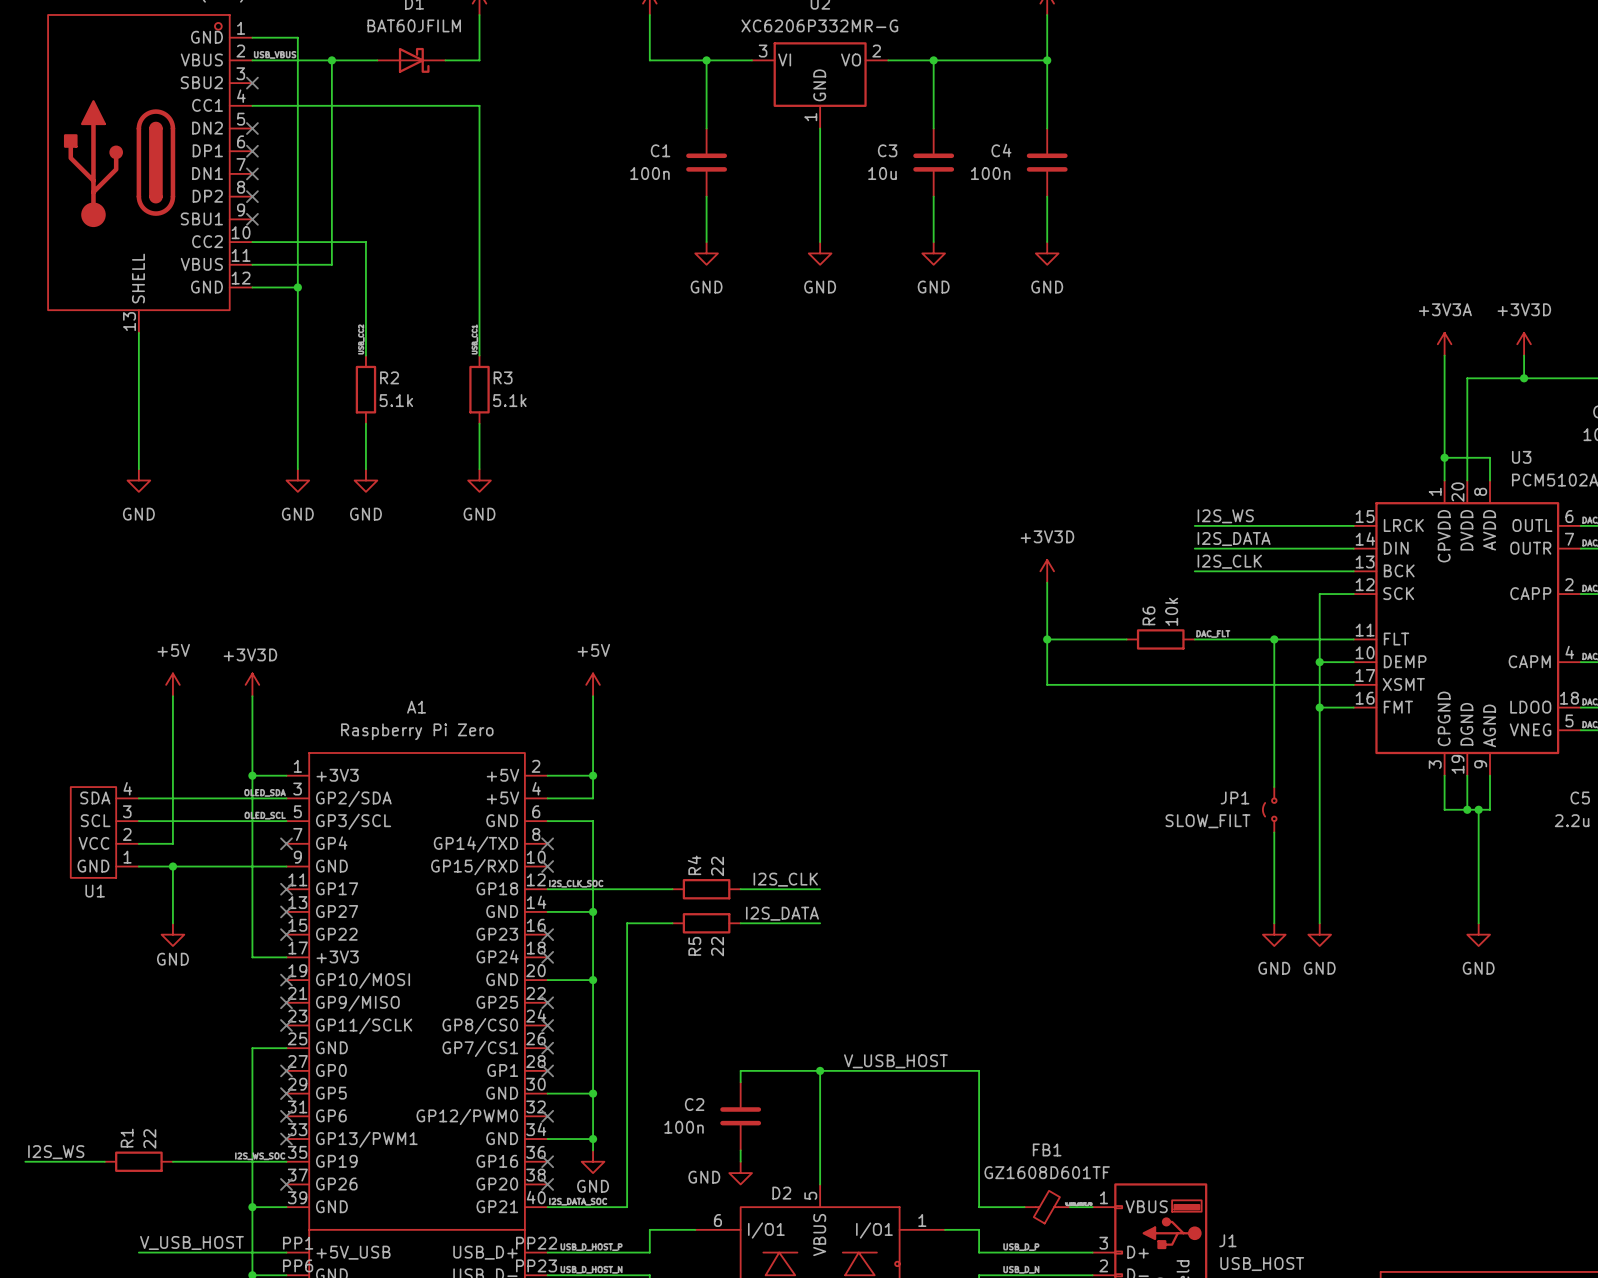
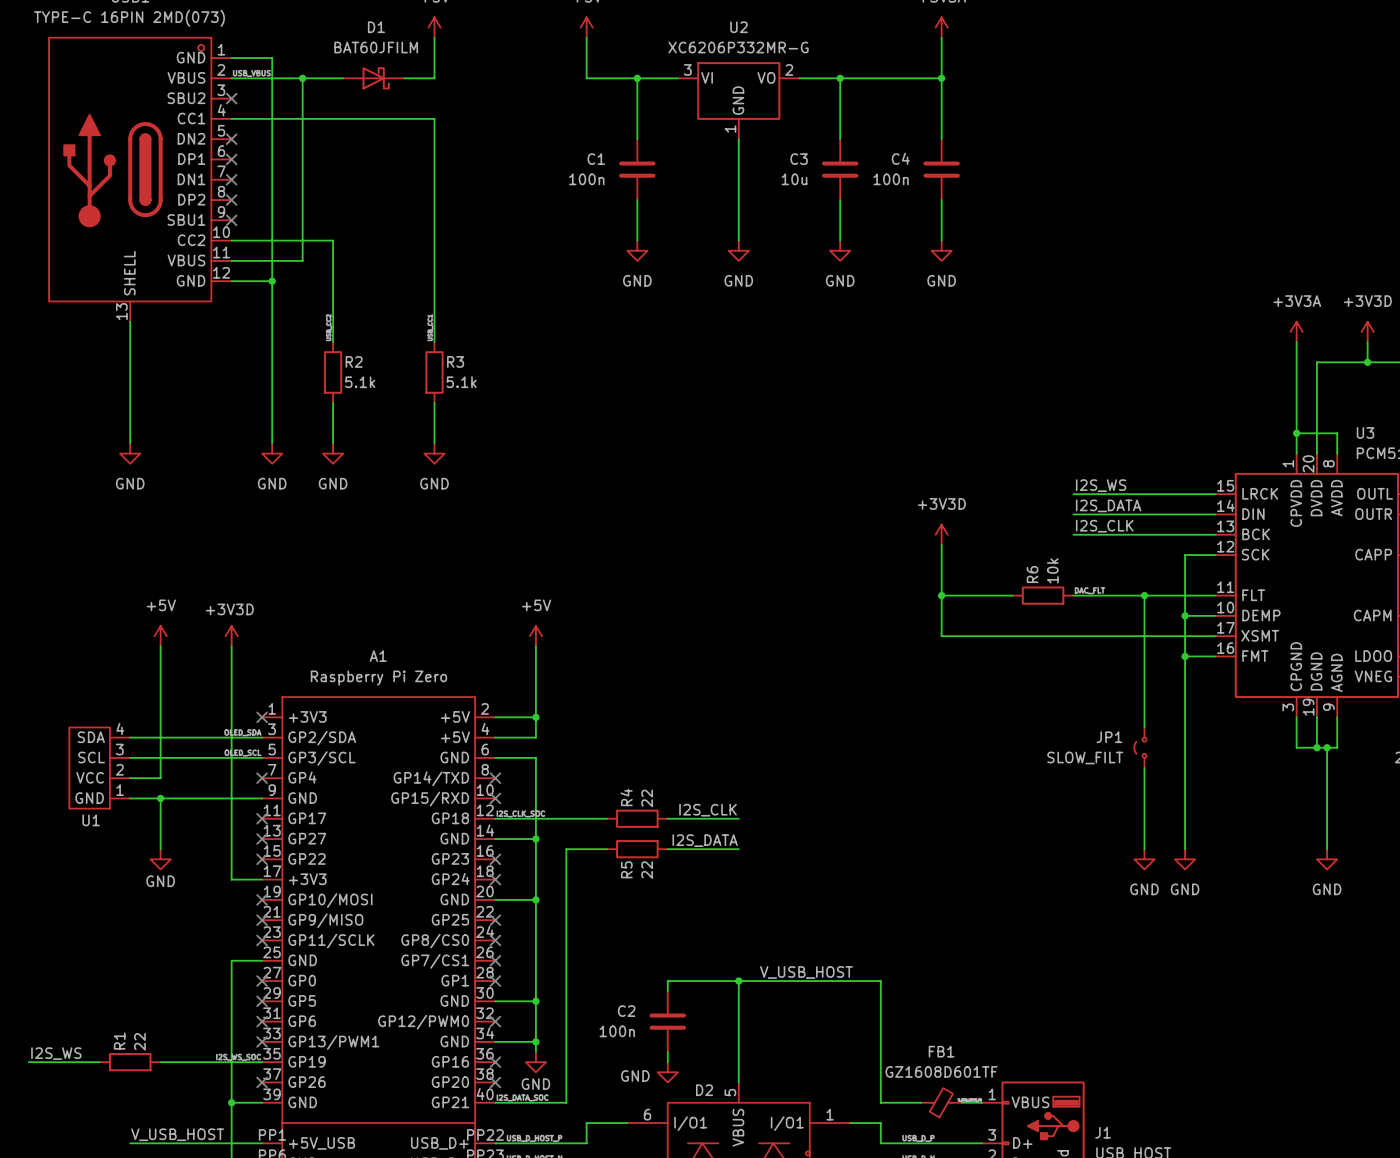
wire: (252, 775) (286, 775) -> none
junction: (252, 775) -> none
no-connect mark: none -> (262, 717)

